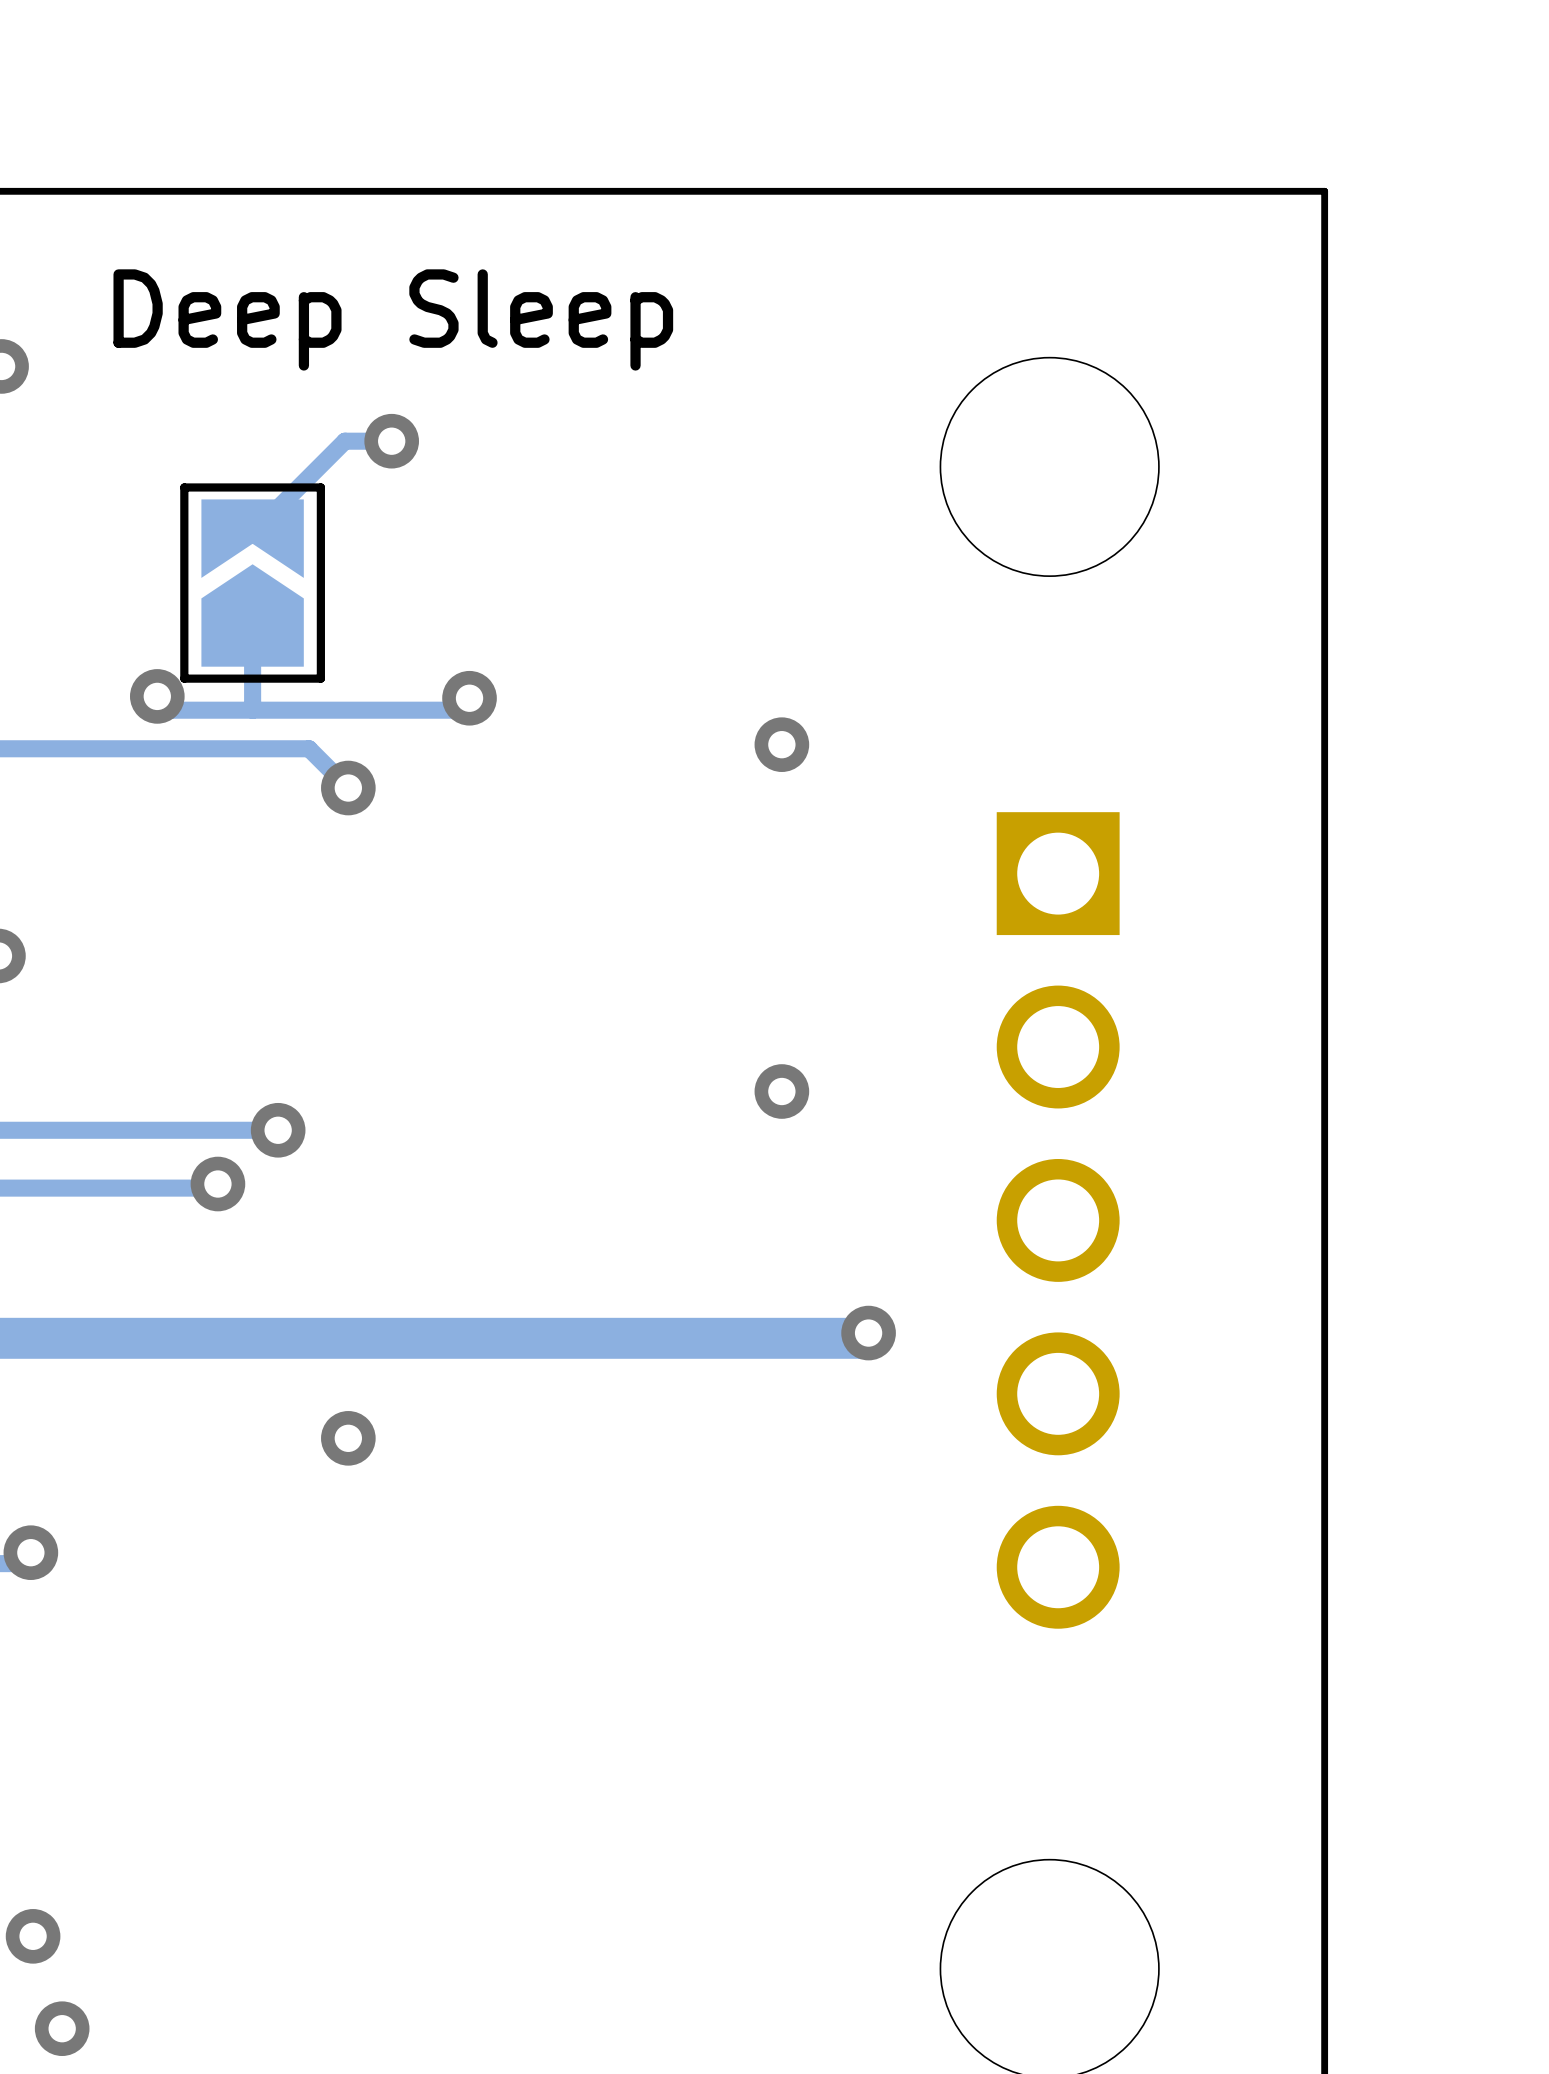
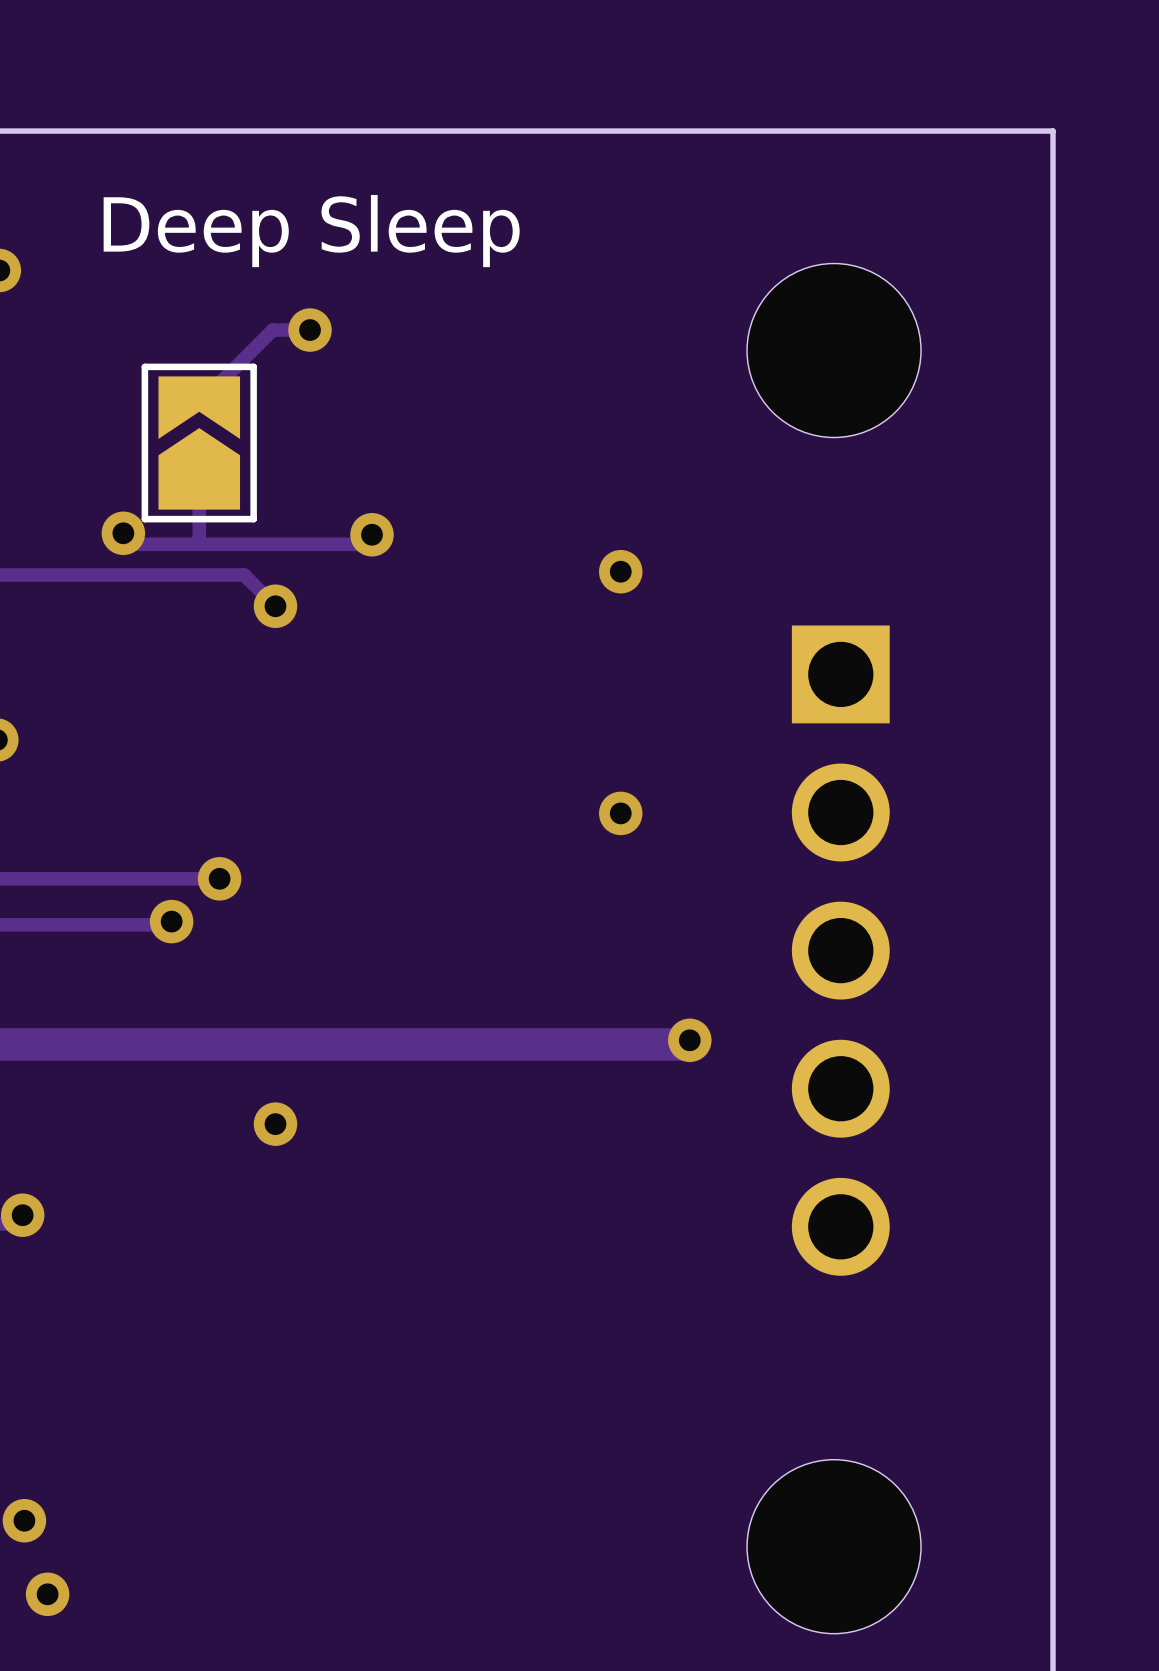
via position: (781, 1091) -> (620, 813)

